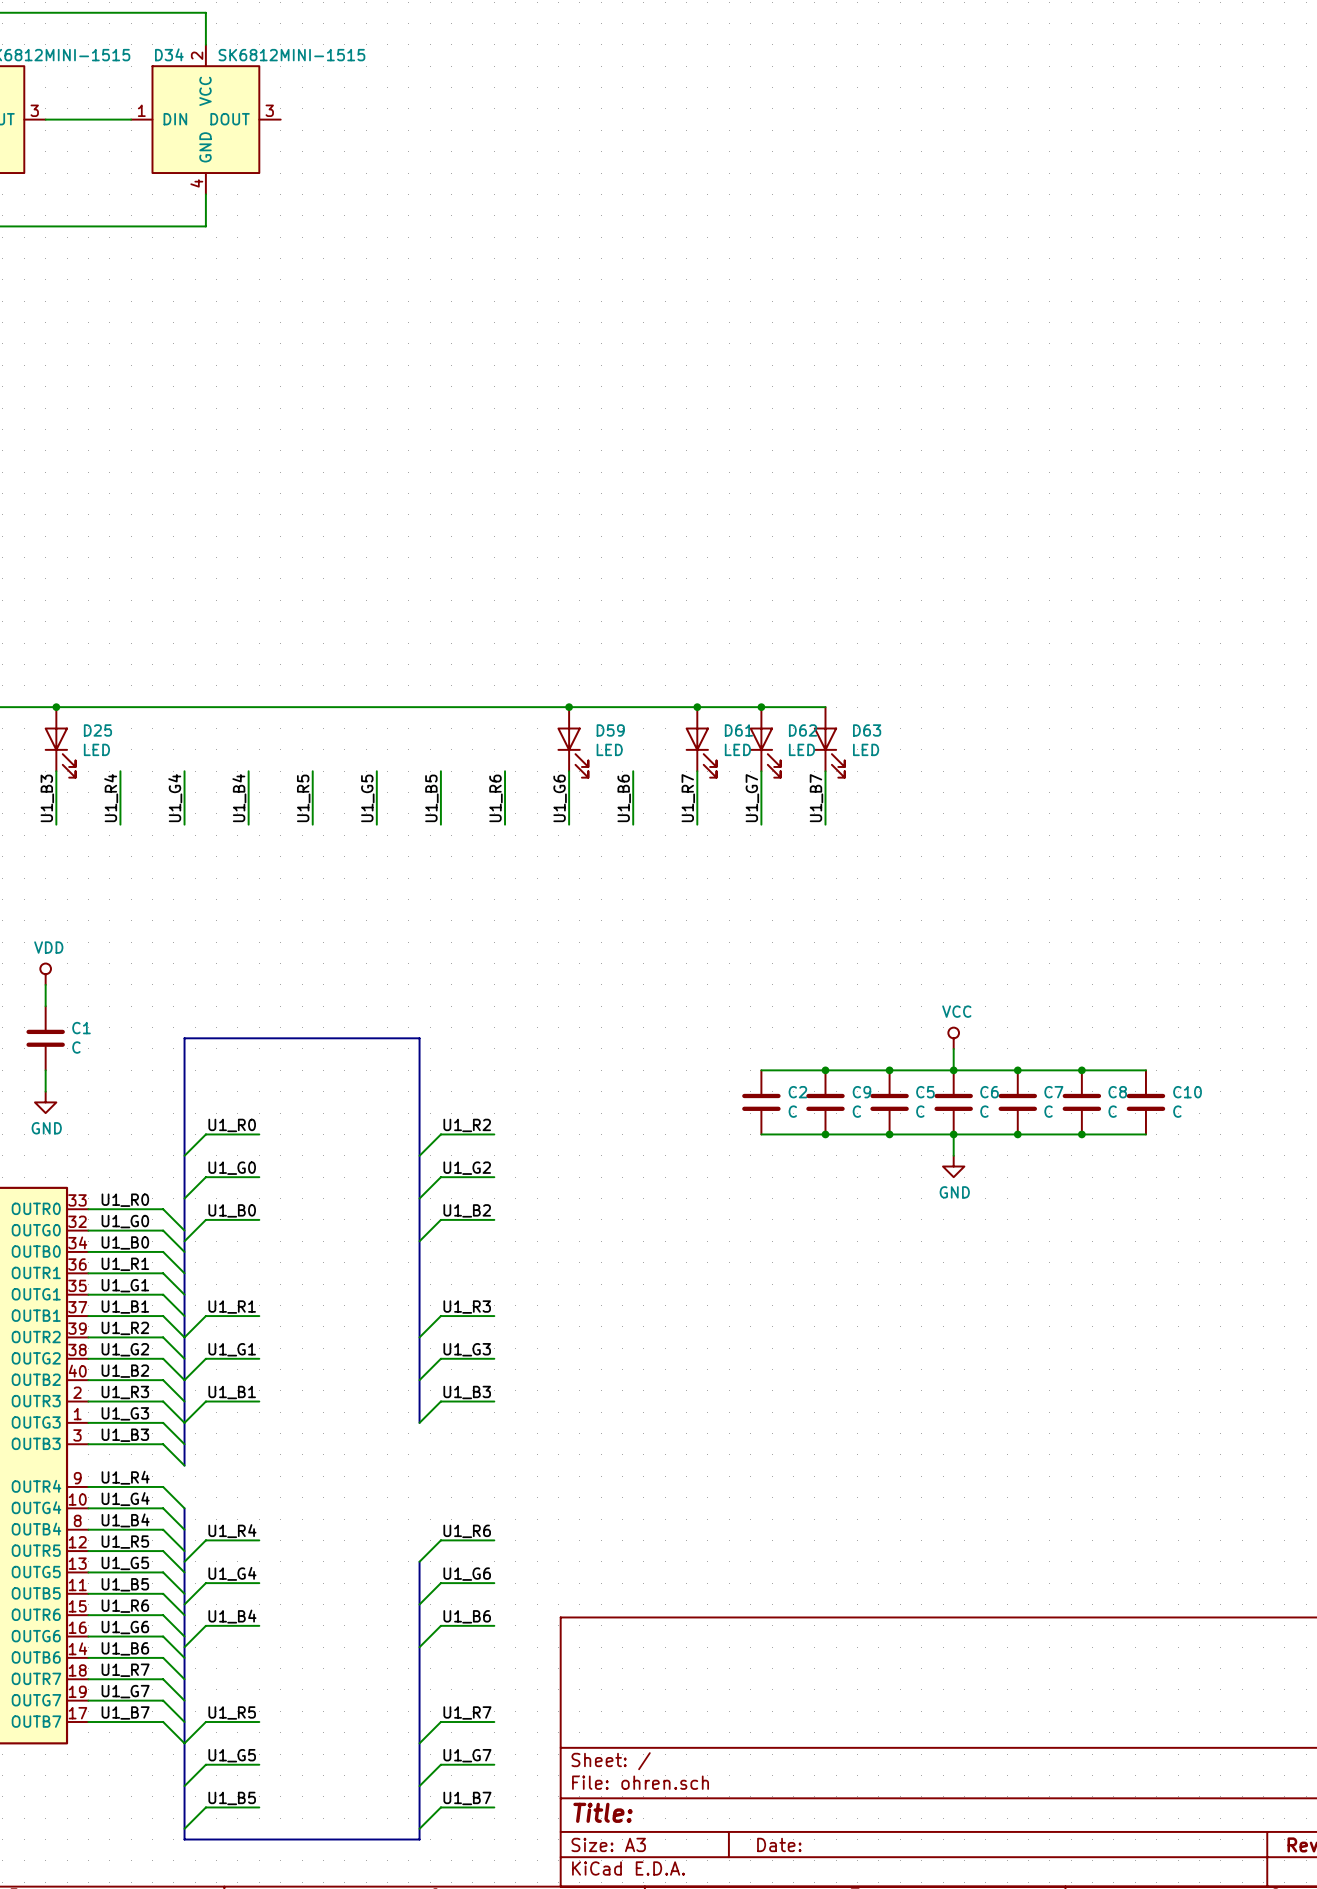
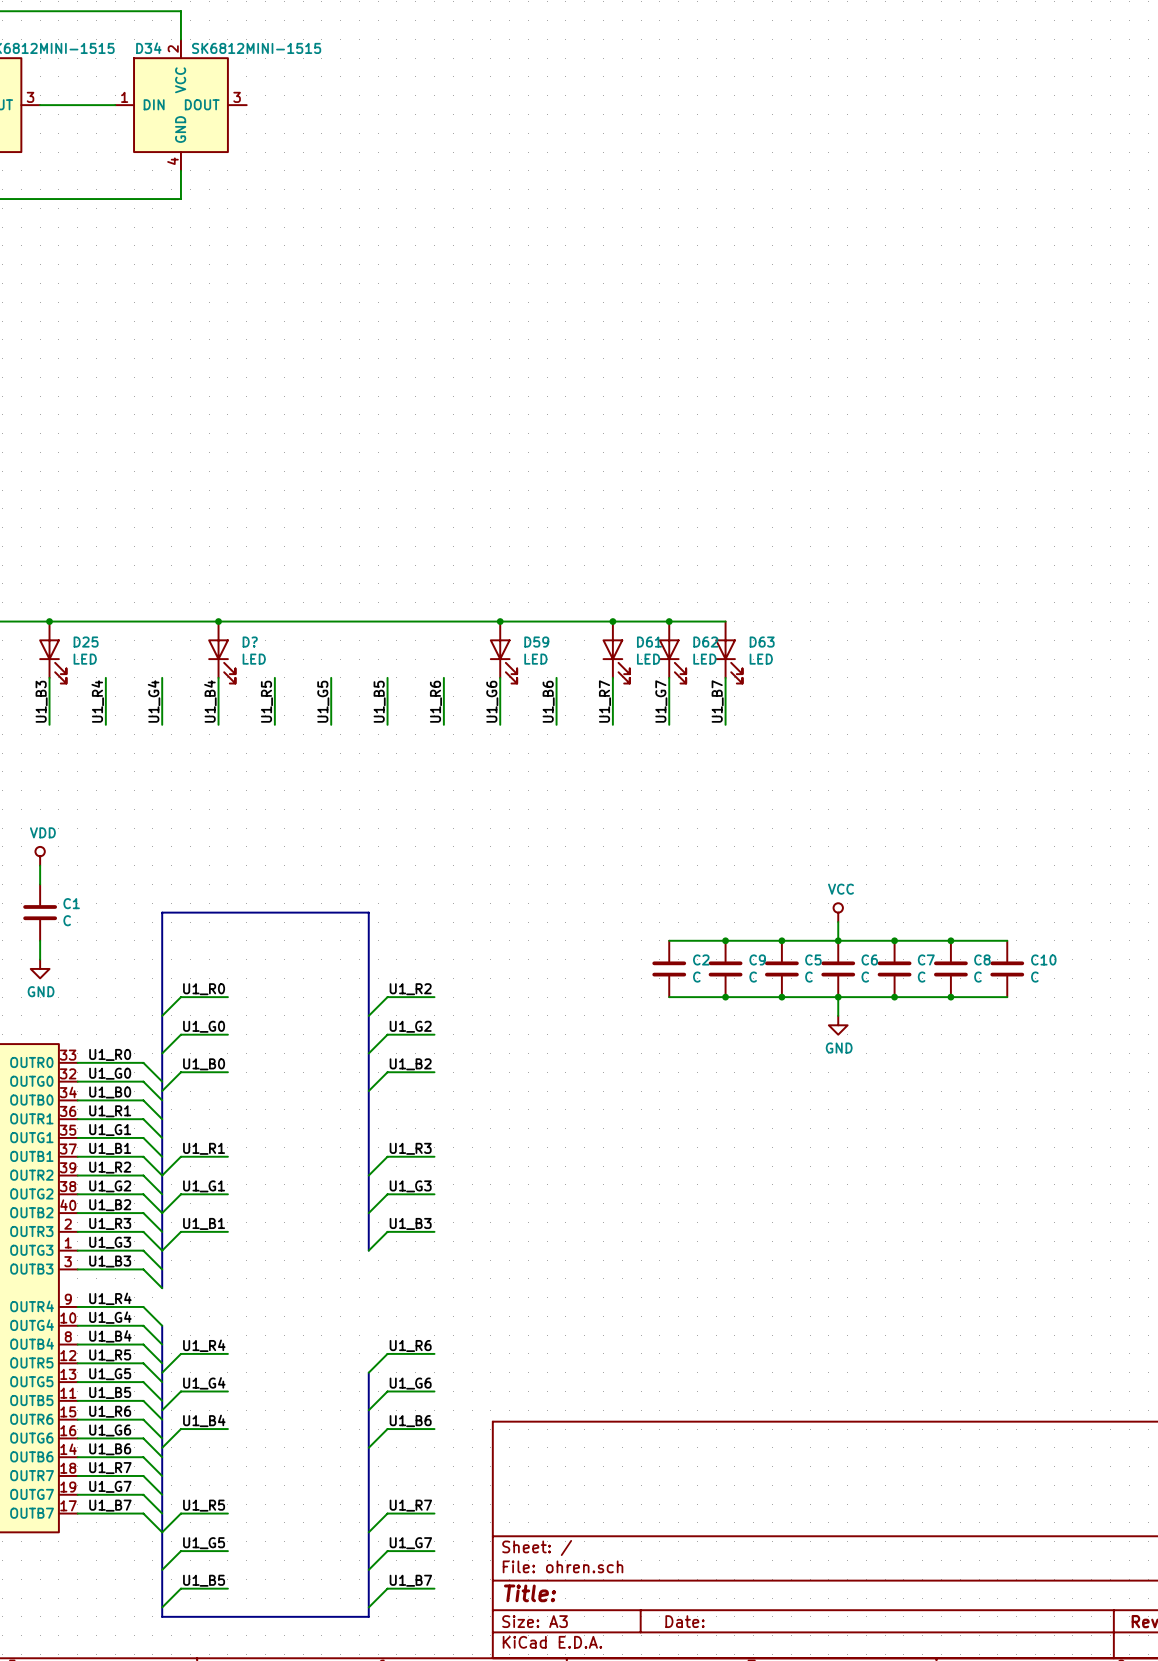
junction: none -> (218, 621)
D?: none -> LED (221, 652)

